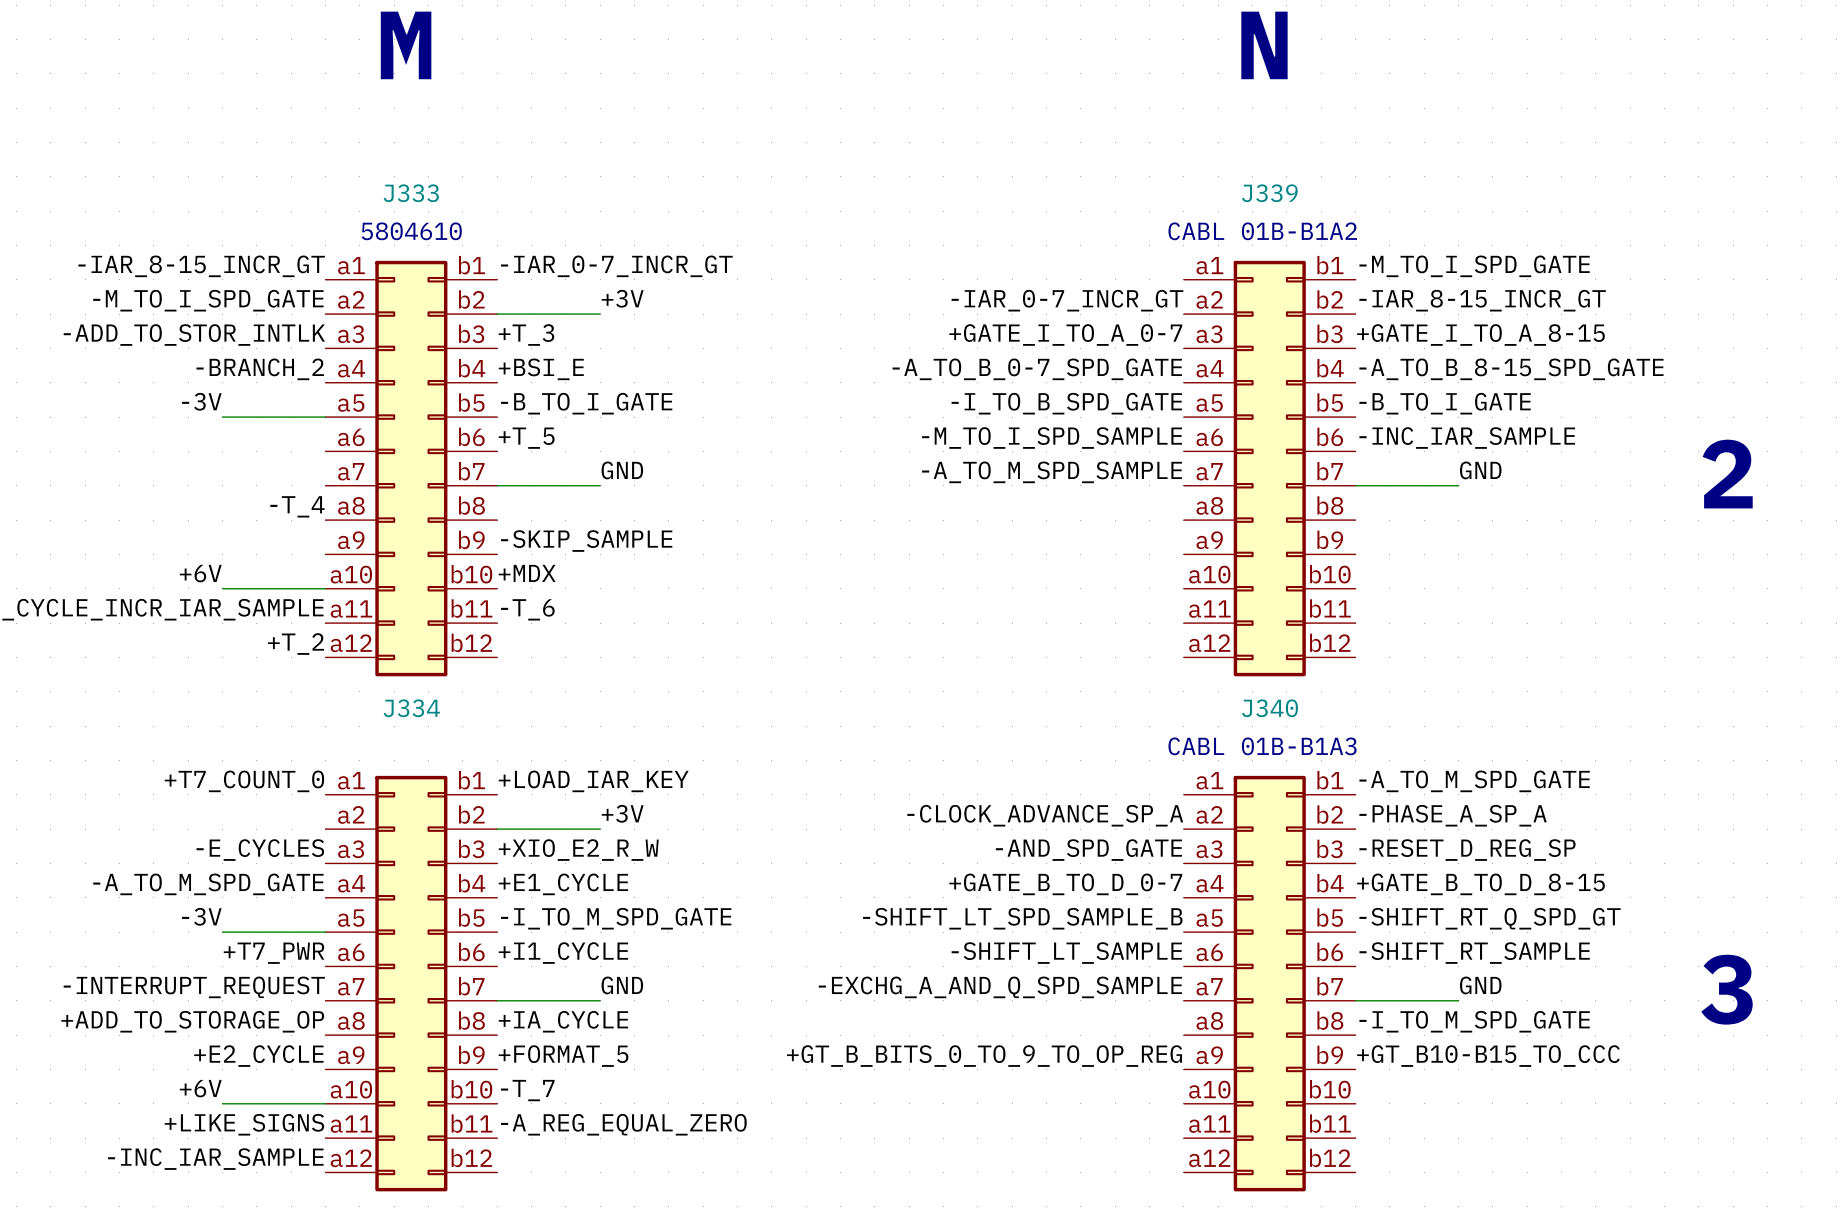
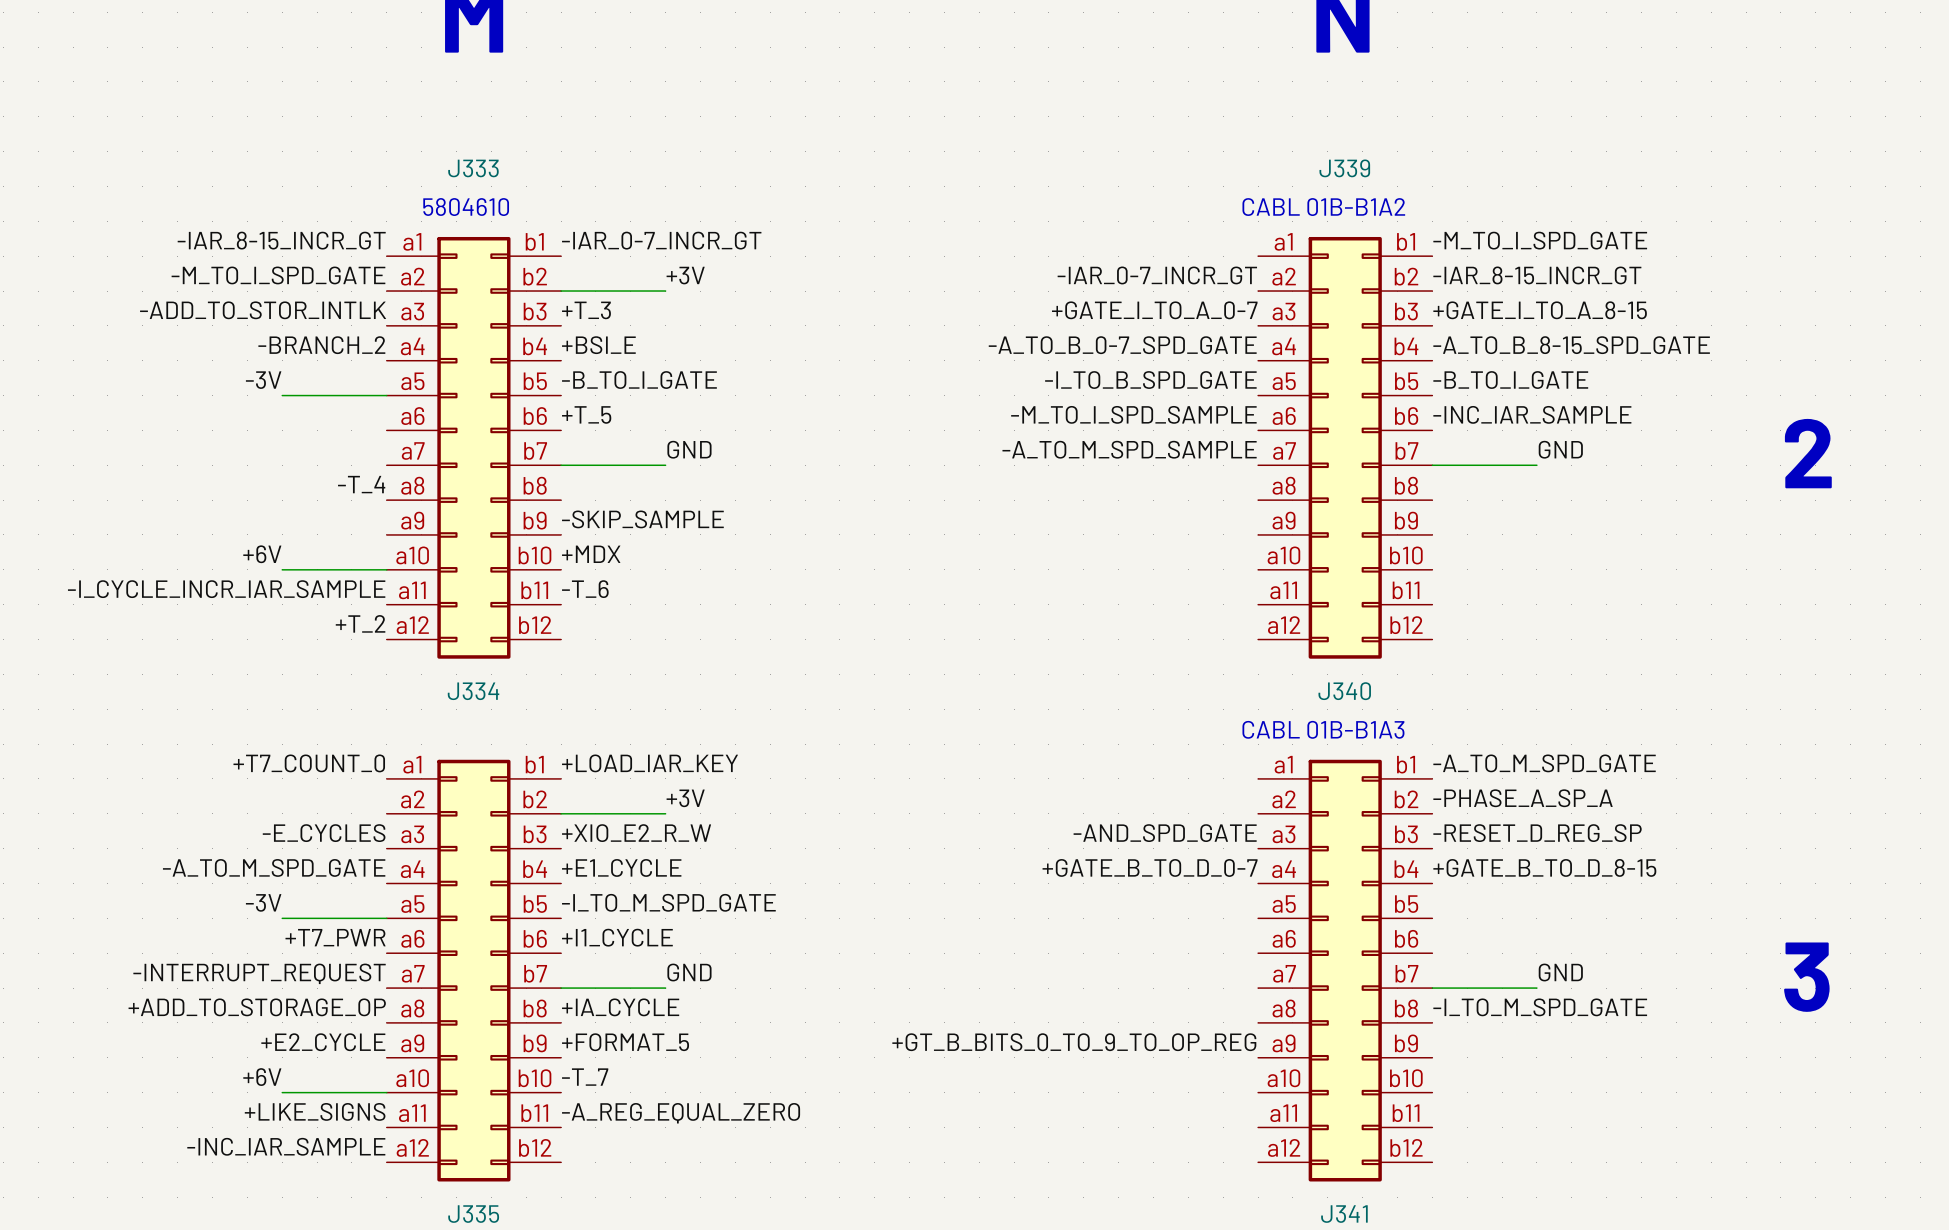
label: -CLOCK_ADVANCE_SP_A (1045, 815) -> none
label: -SHIFT_LT_SPD_SAMPLE_B (1022, 918) -> none
label: -SHIFT_RT_Q_SPD_GT (1490, 918) -> none
label: -SHIFT_LT_SAMPLE (1066, 953) -> none
label: -SHIFT_RT_SAMPLE (1474, 953) -> none
label: -EXCHG_A_AND_Q_SPD_SAMPLE (1000, 987) -> none
label: +GT_B10-B15_TO_CCC (1488, 1056) -> none

